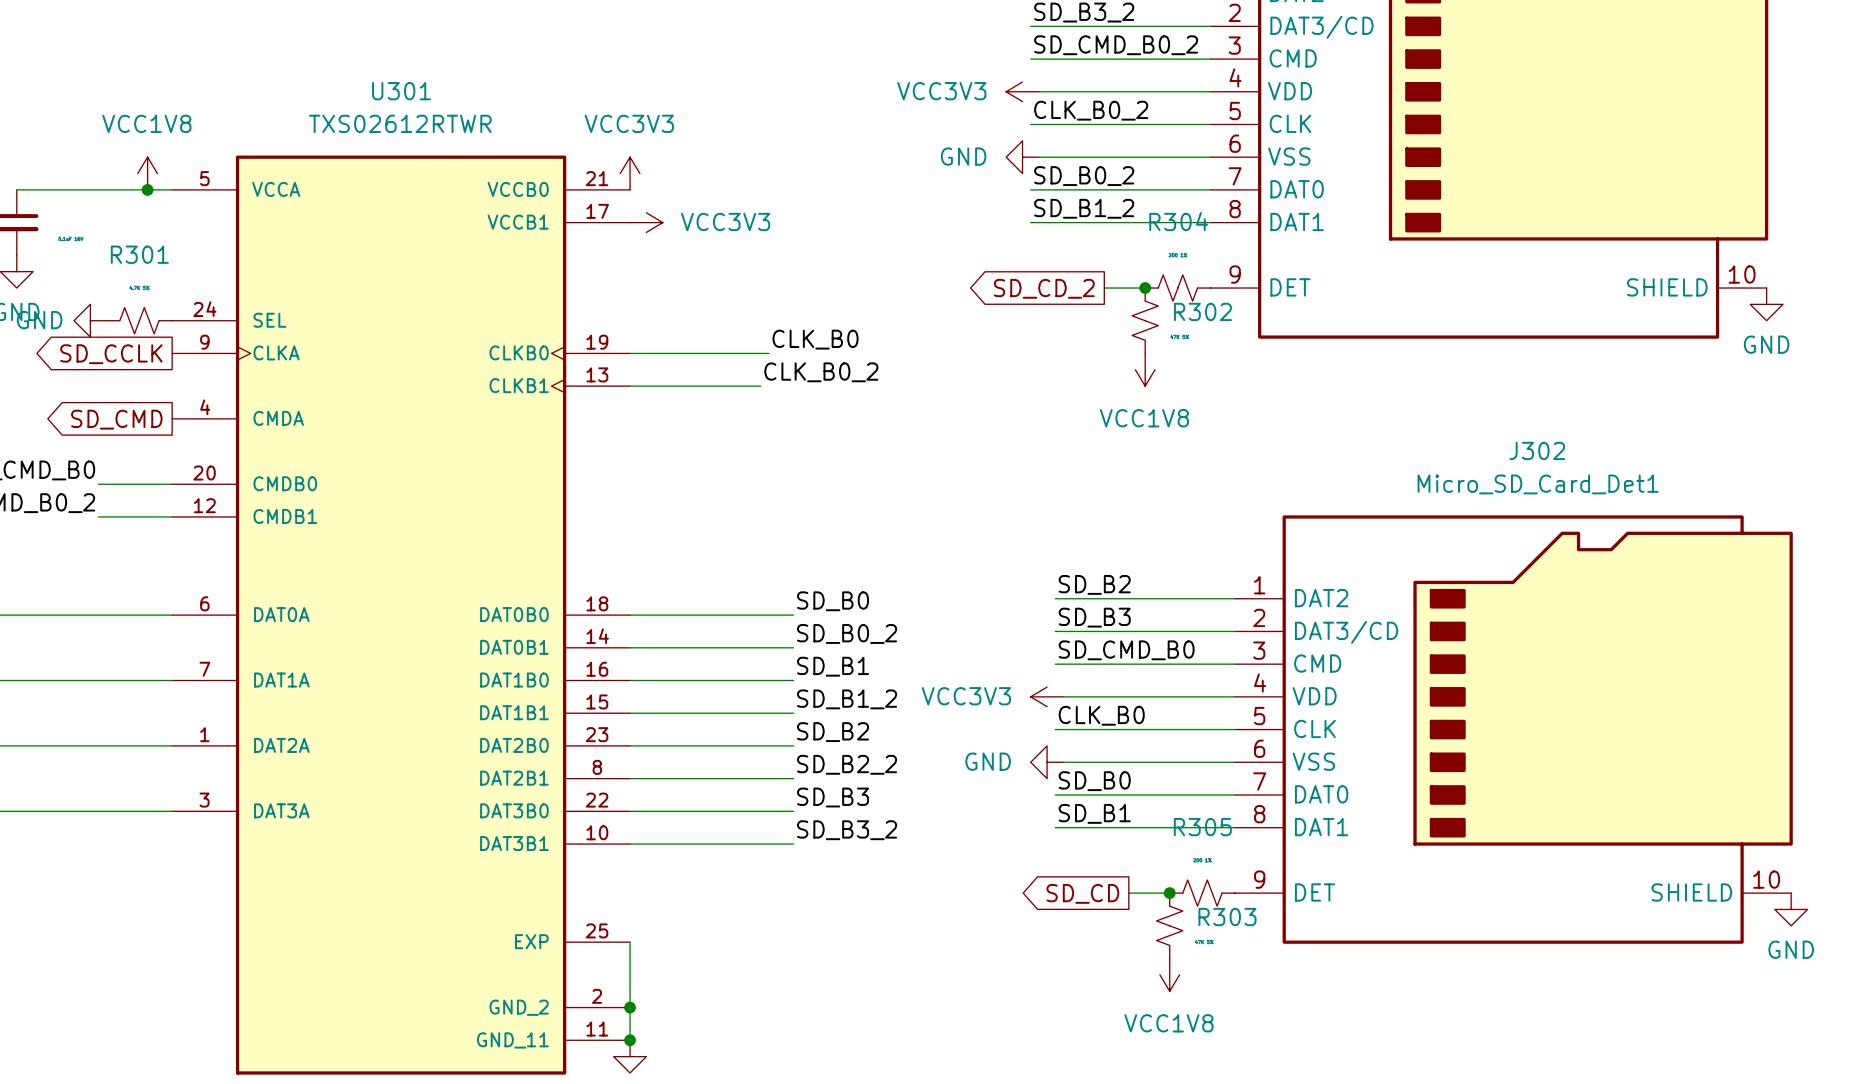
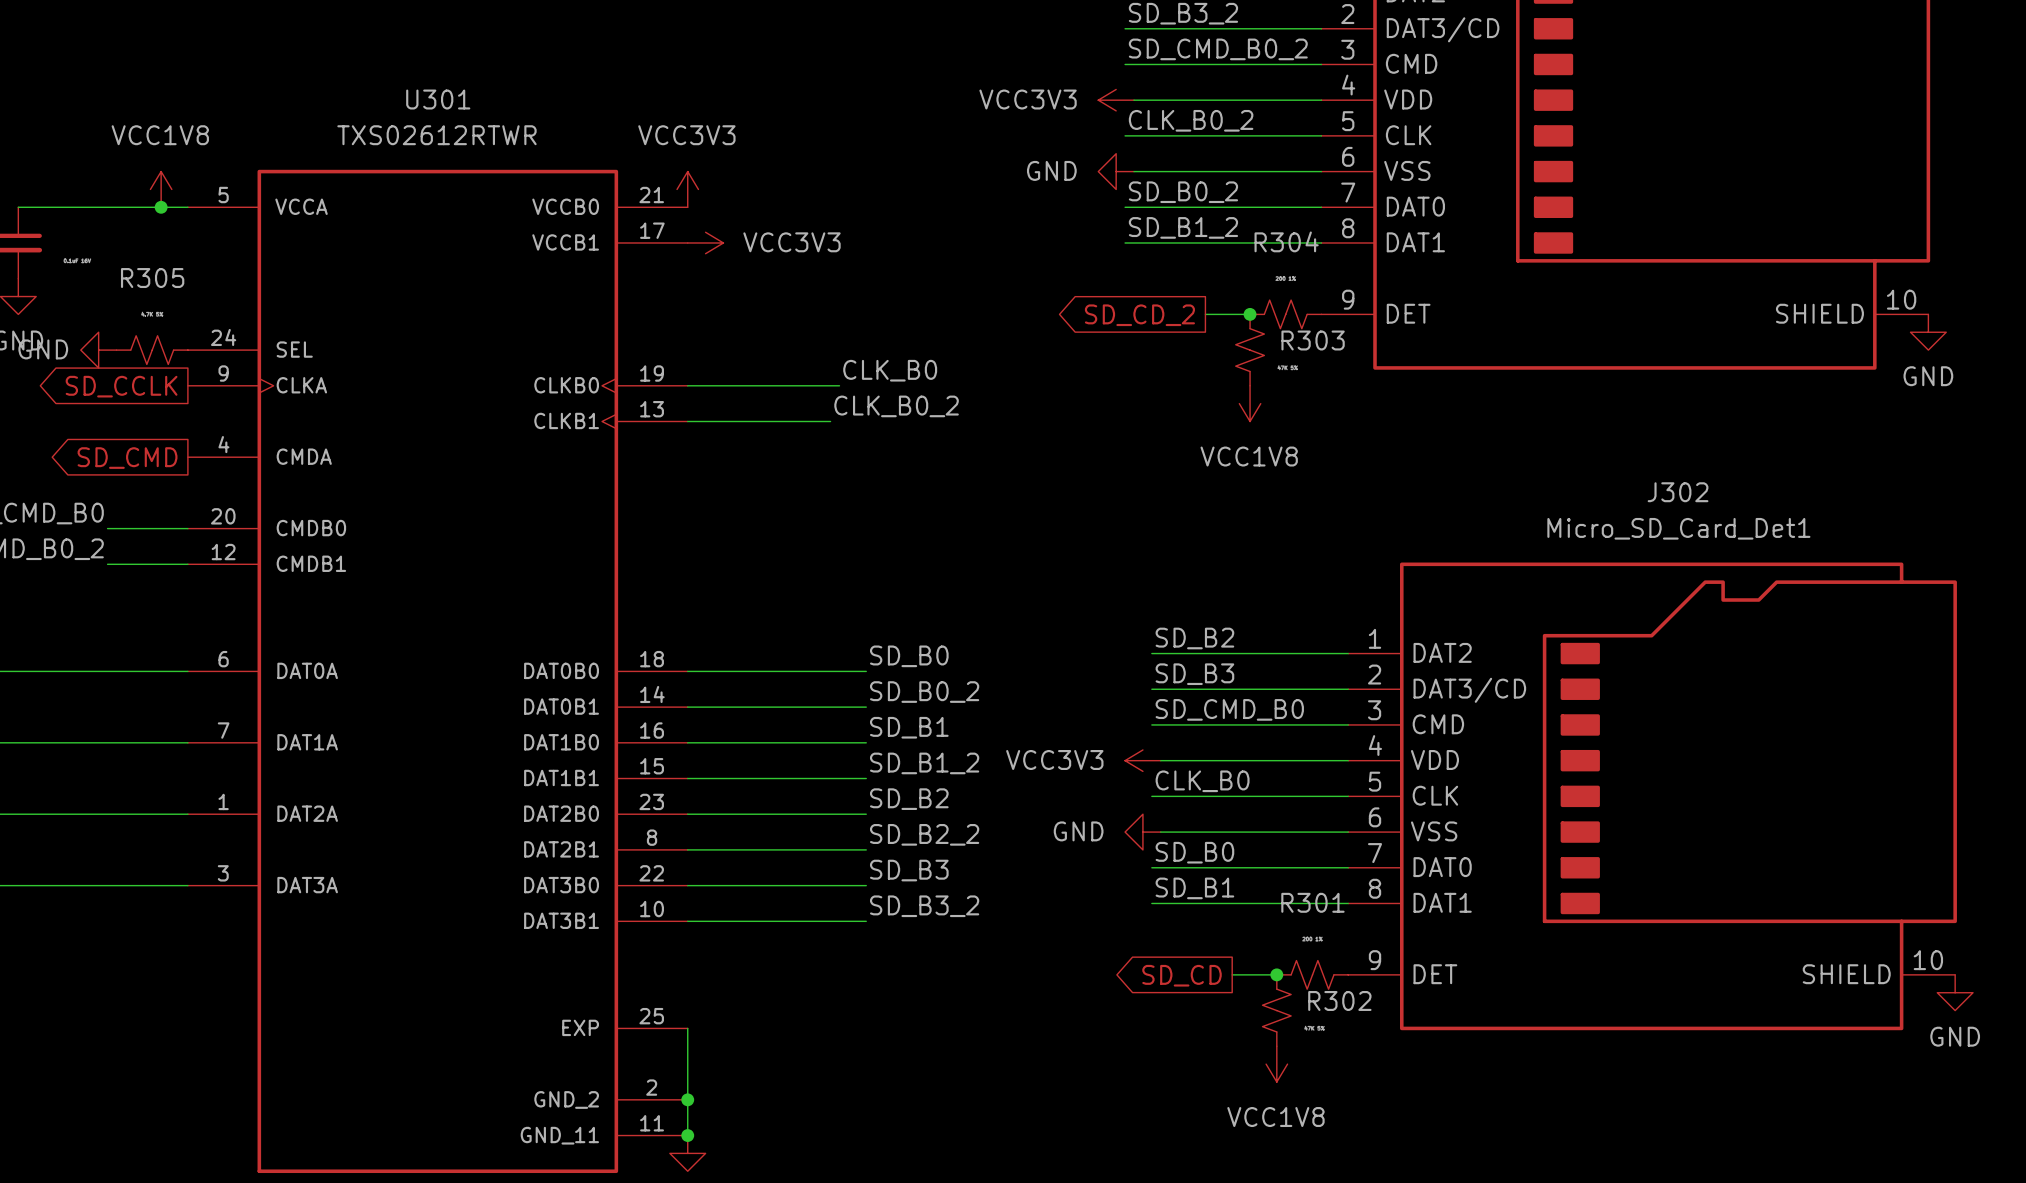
R301 name: R301 (139, 254) -> R305 (152, 278)
R302 name: R302 (1202, 311) -> R303 (1313, 340)
R305 name: R305 (1202, 827) -> R301 (1312, 902)
R303 name: R303 (1227, 917) -> R302 (1339, 1000)

